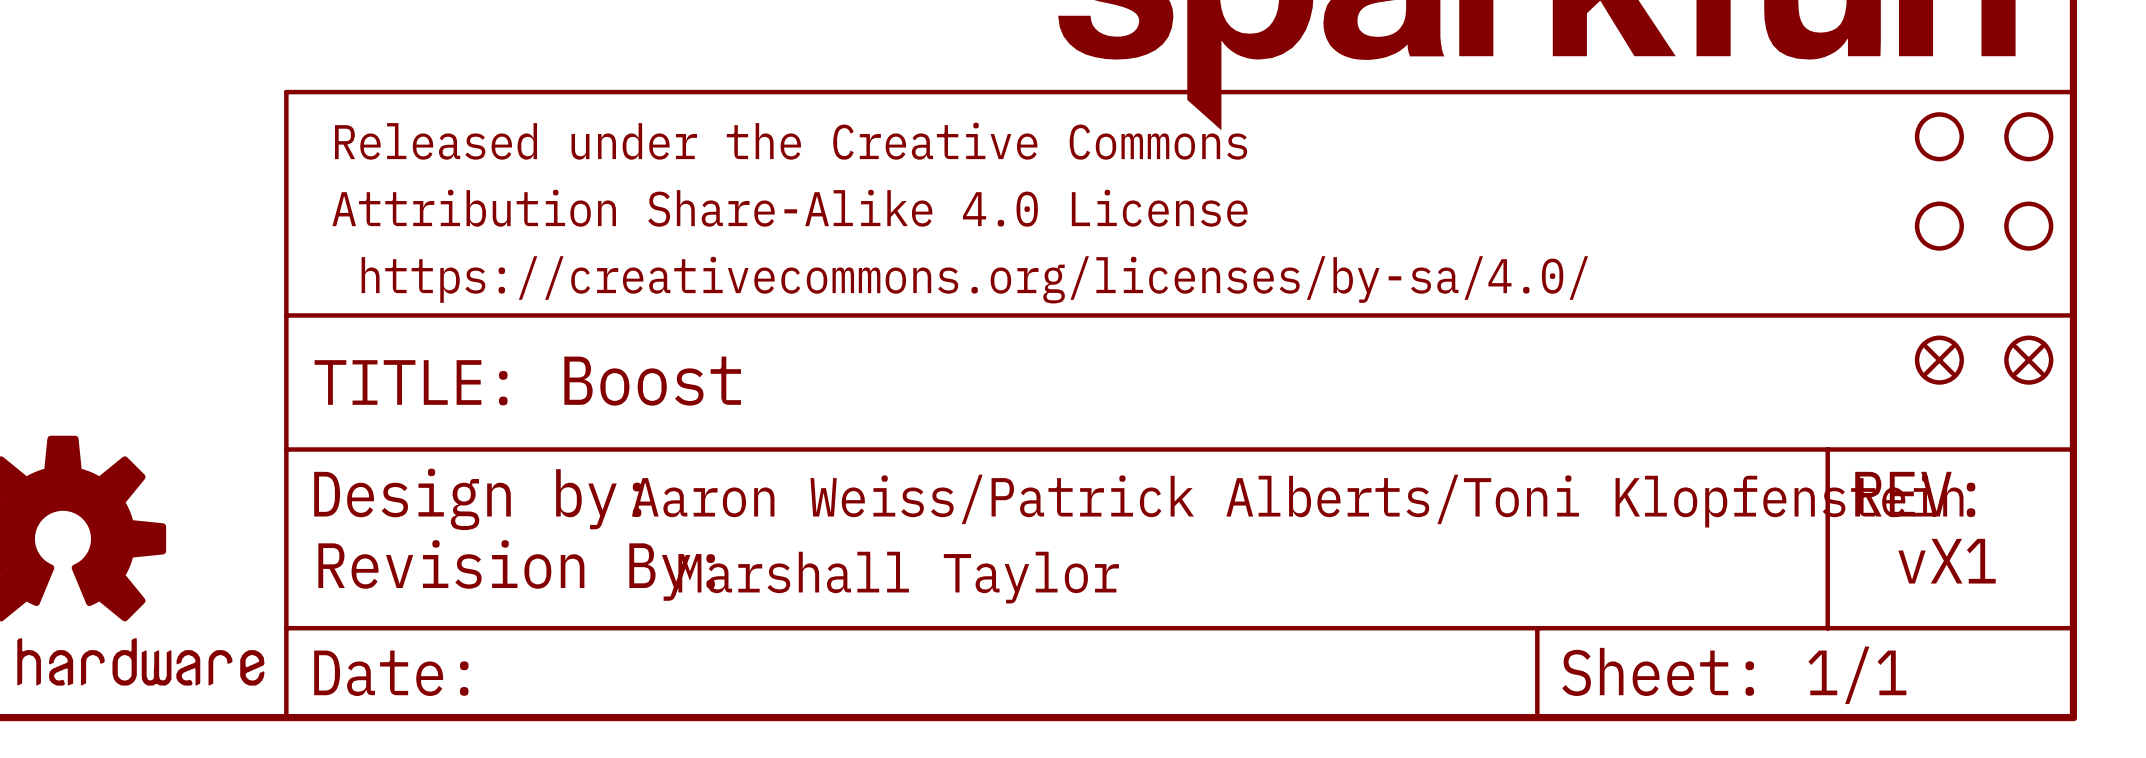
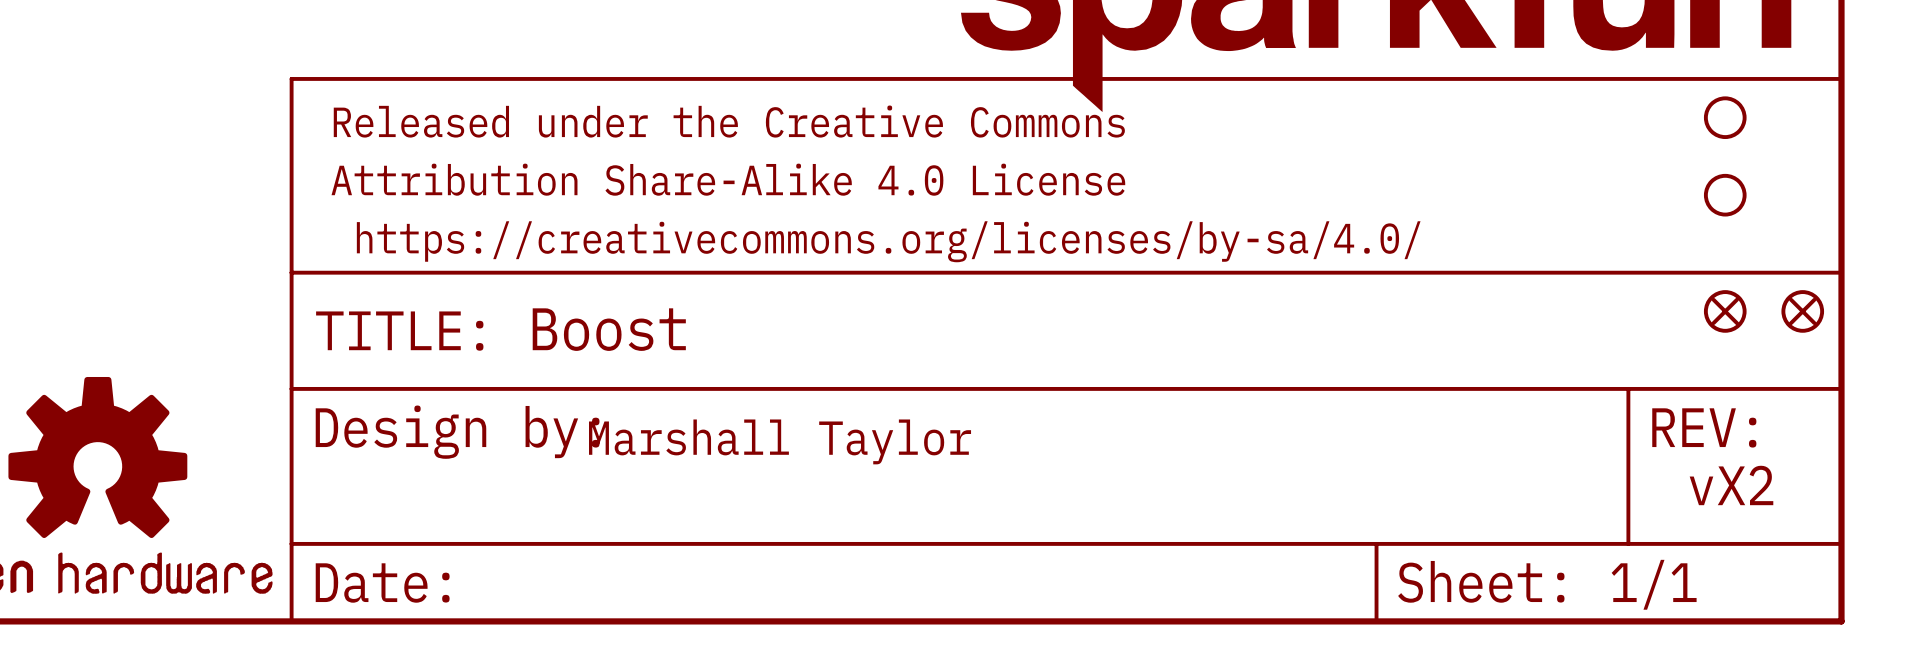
part: (2028, 136) -> none
part: (2028, 226) -> none
text: Aaron Weiss/Patrick Alberts/Toni Klopfenstein (1297, 501) -> Marshall Taylor (780, 441)
text: vX1 (1947, 561) -> vX2 (1731, 485)
part: (516, 570) -> none
text: Marshall Taylor (898, 577) -> none

